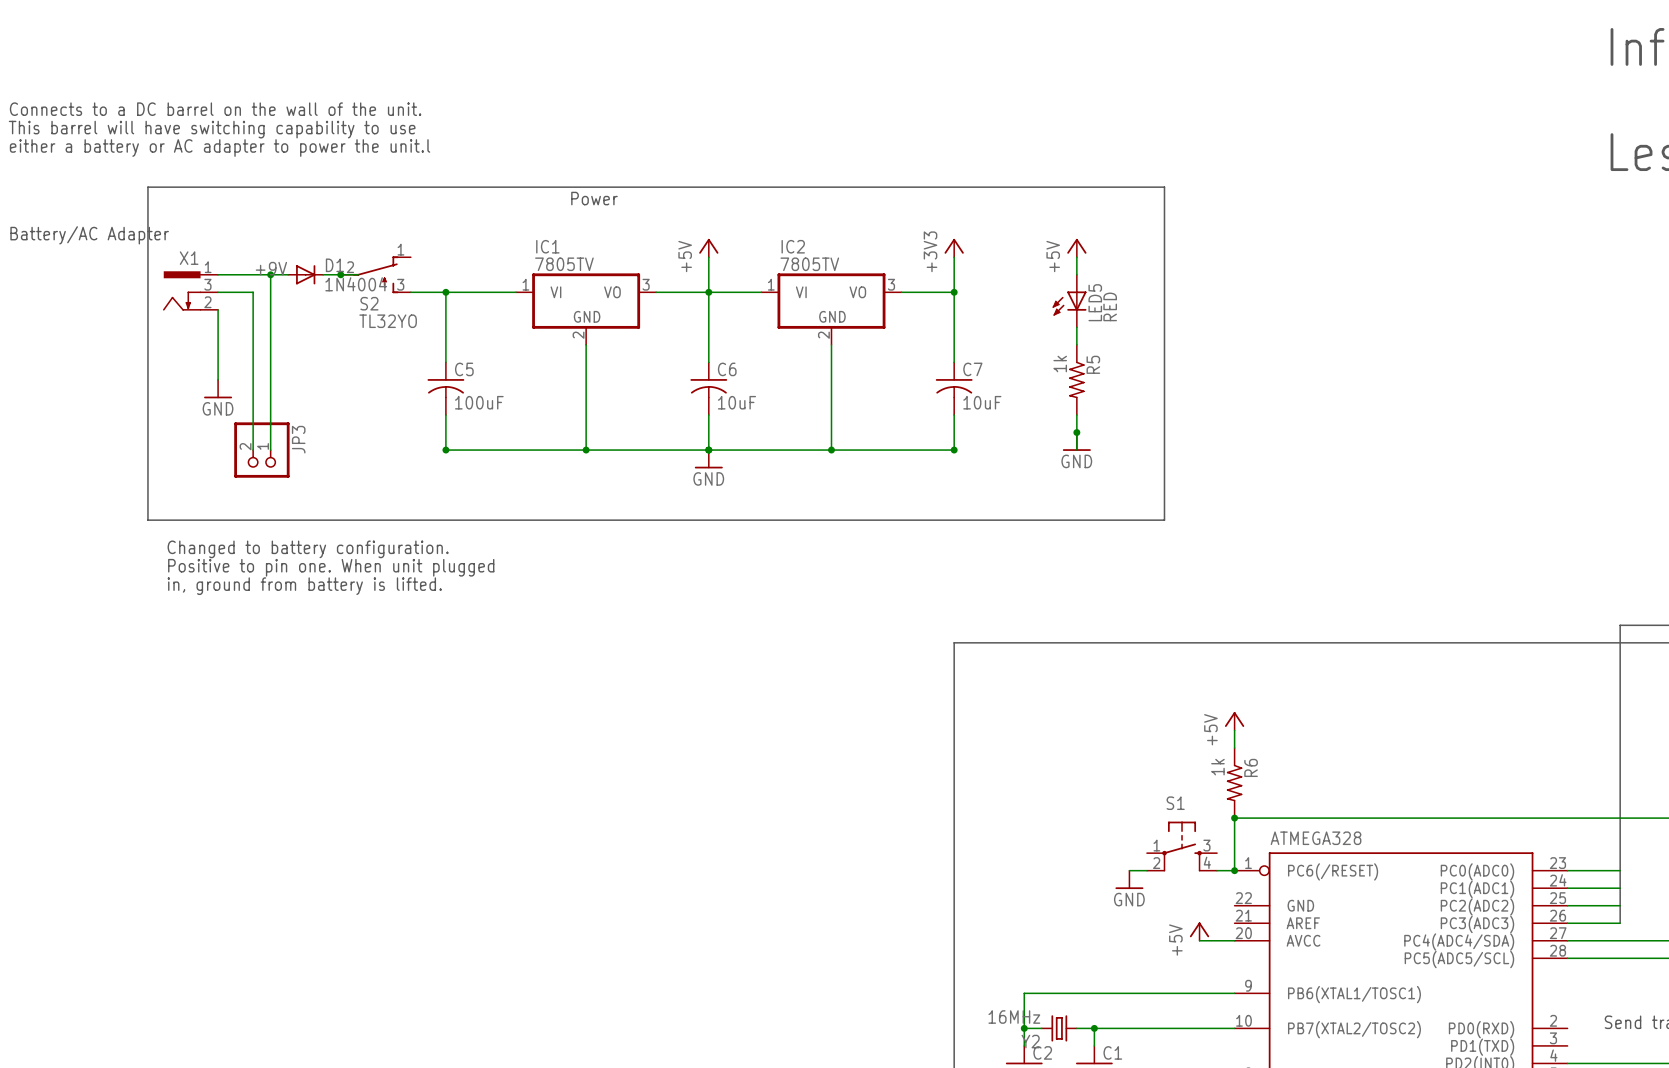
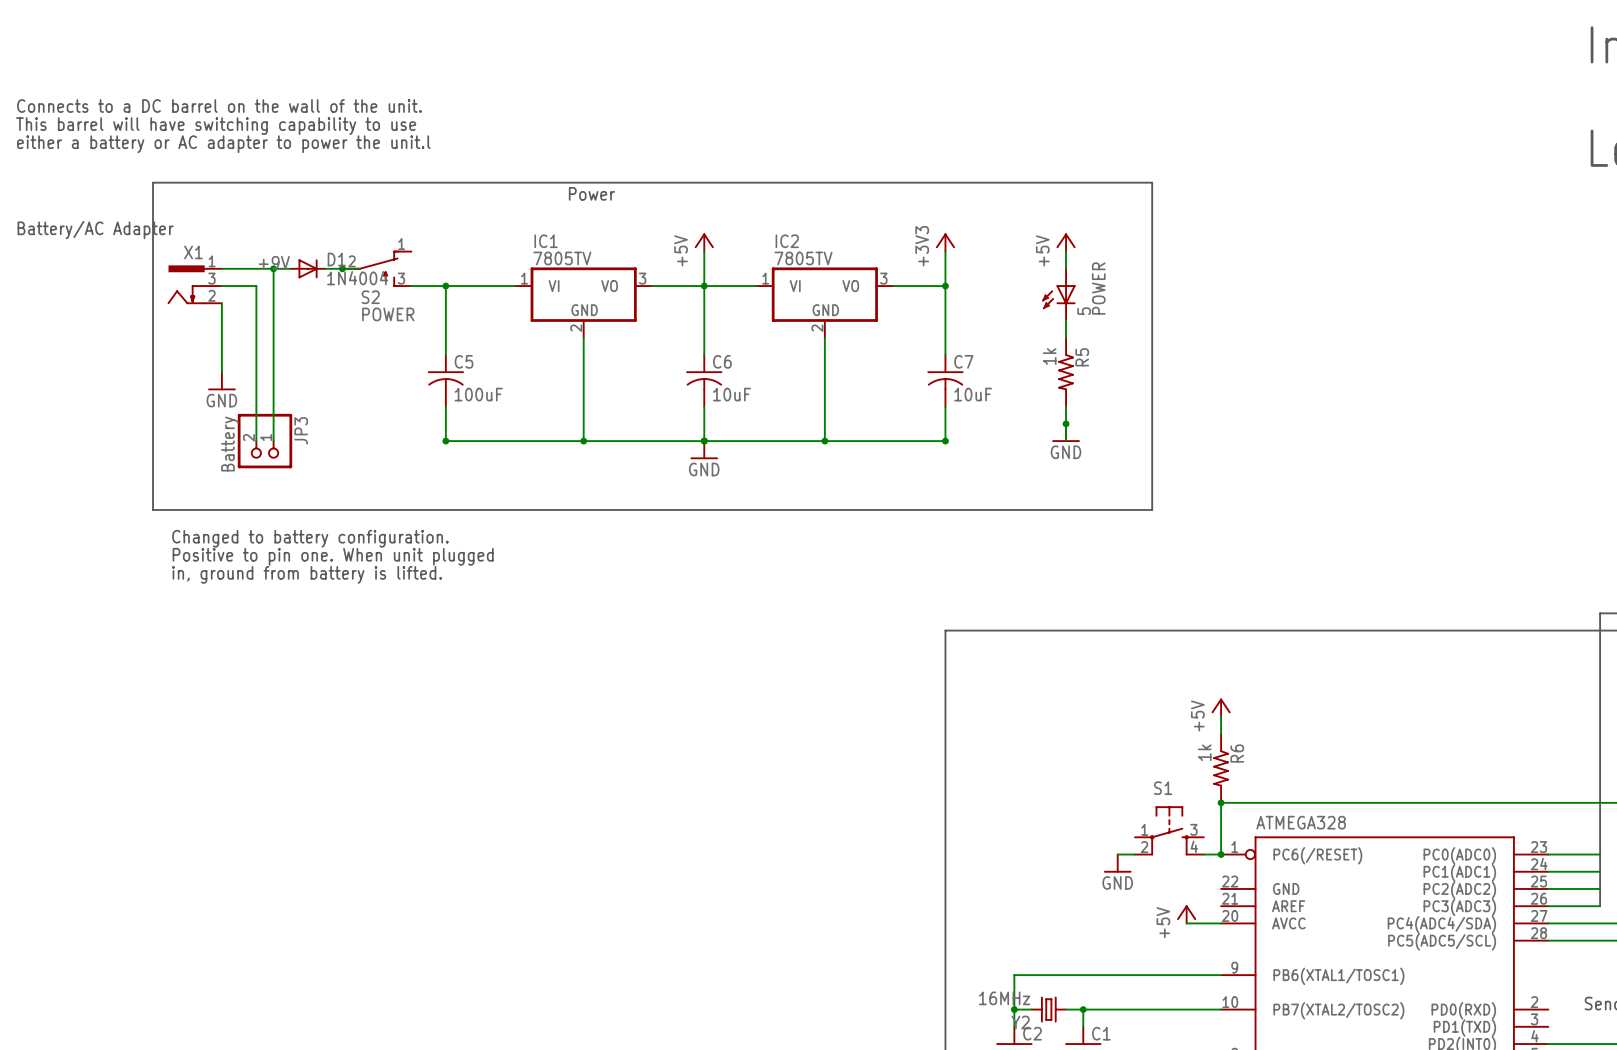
LED5 name: LED5 (1095, 302) -> 5 (1084, 311)
LED5 value: RED (1110, 306) -> POWER (1098, 288)
S2 value: TL32YO (388, 321) -> POWER (388, 314)
JP3 value: none -> Battery (229, 444)

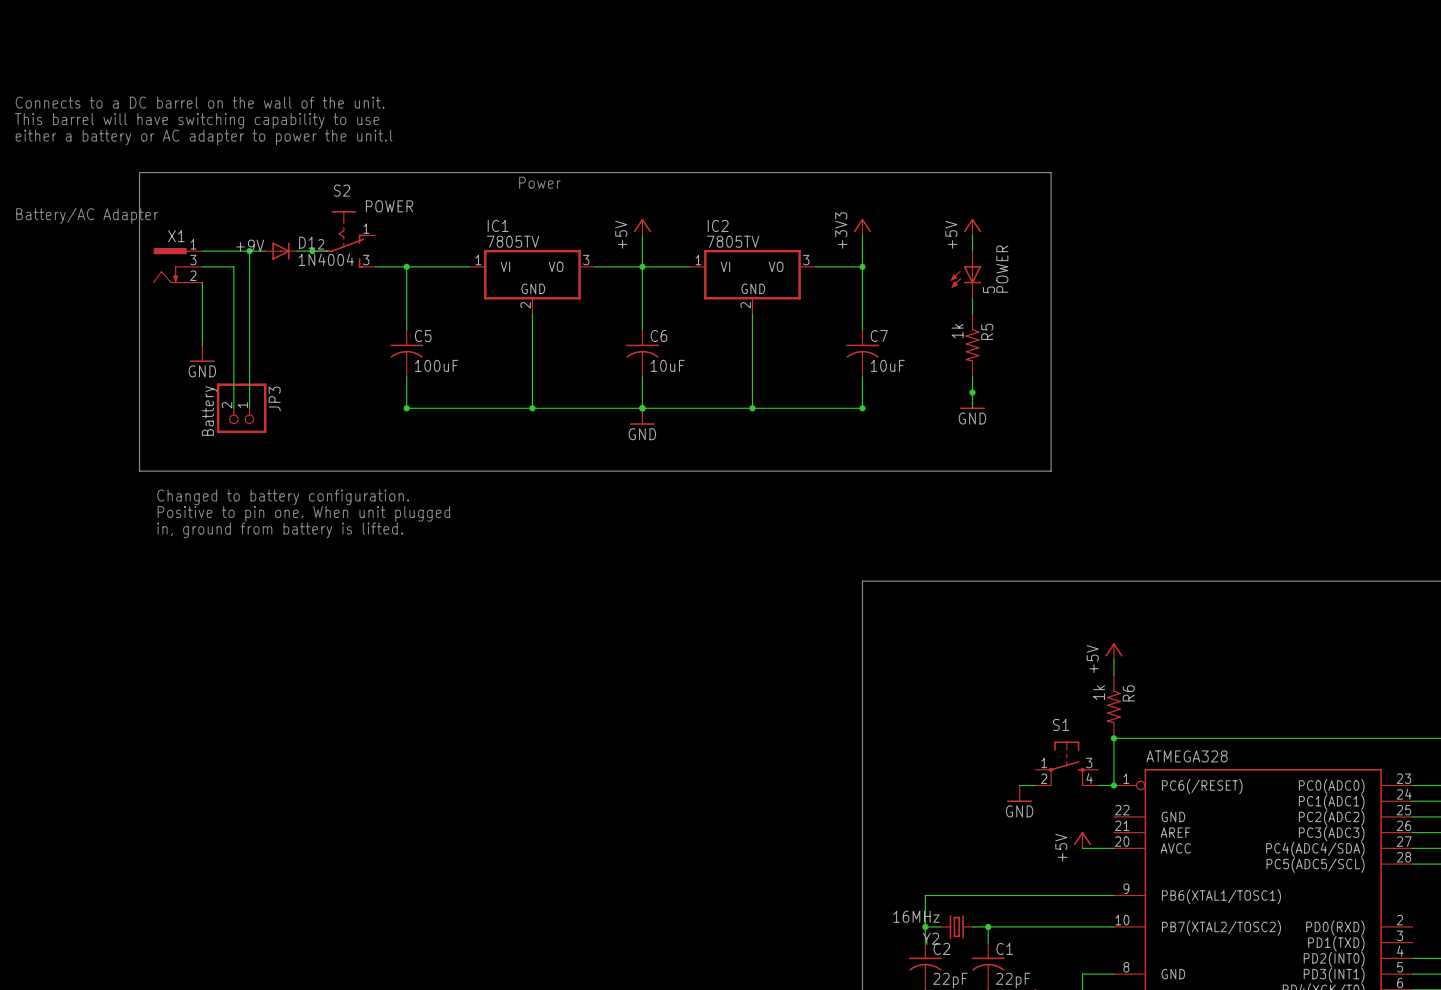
S2 symbol: [342, 250, 412, 287] -> [312, 211, 376, 268]
S2 name position: S2 (370, 297) -> S2 (342, 190)
S2 value position: POWER (388, 314) -> POWER (389, 206)

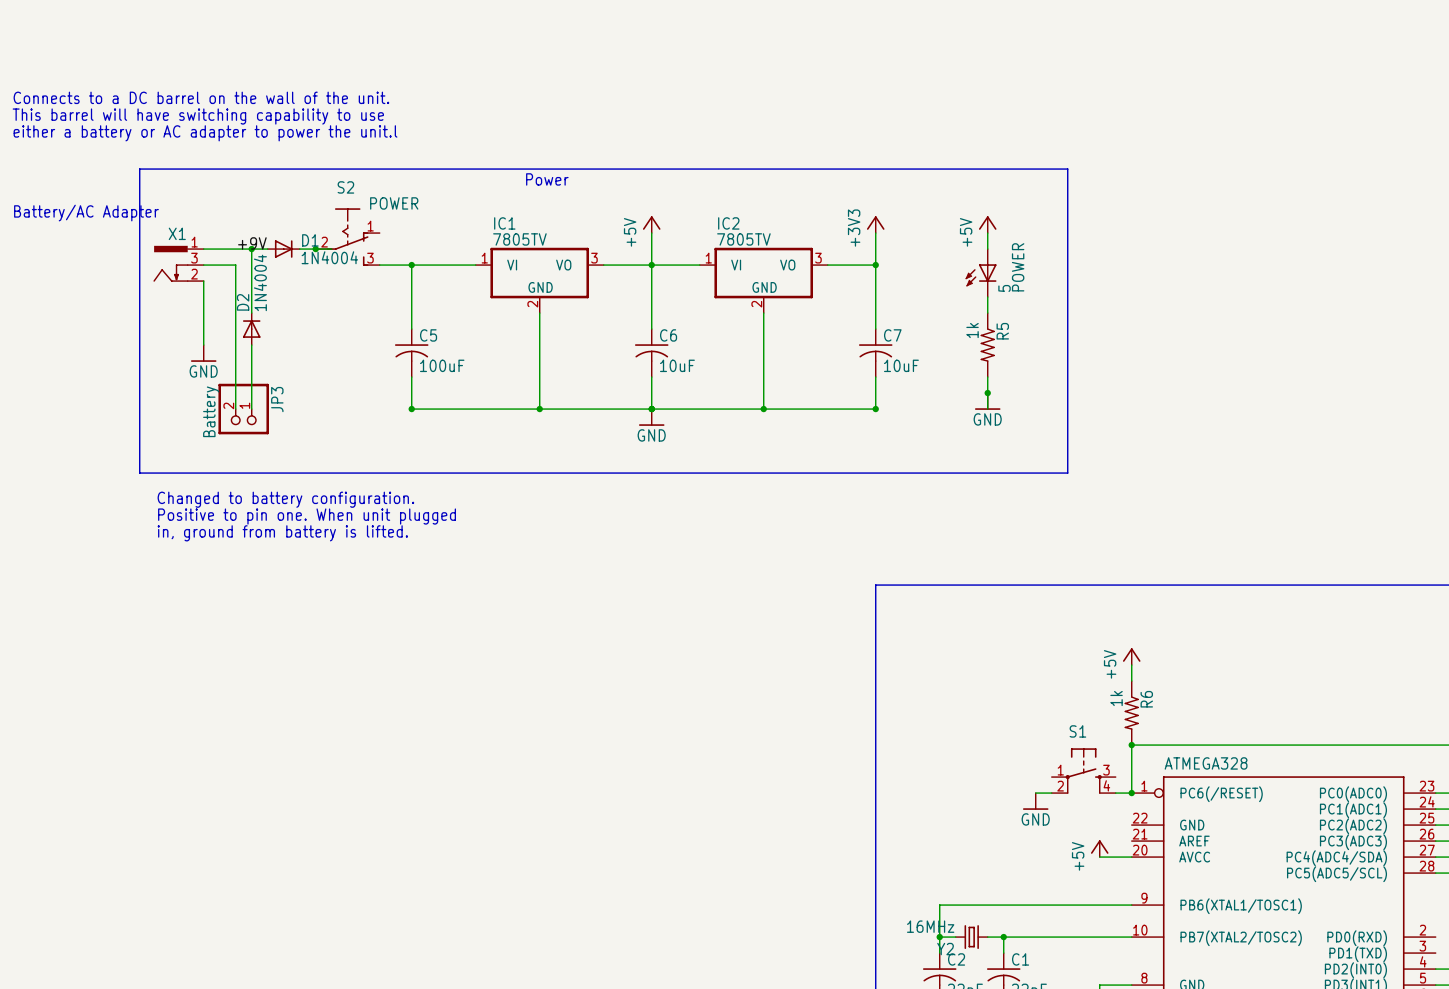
D2: none -> 1N4004 (251, 329)

